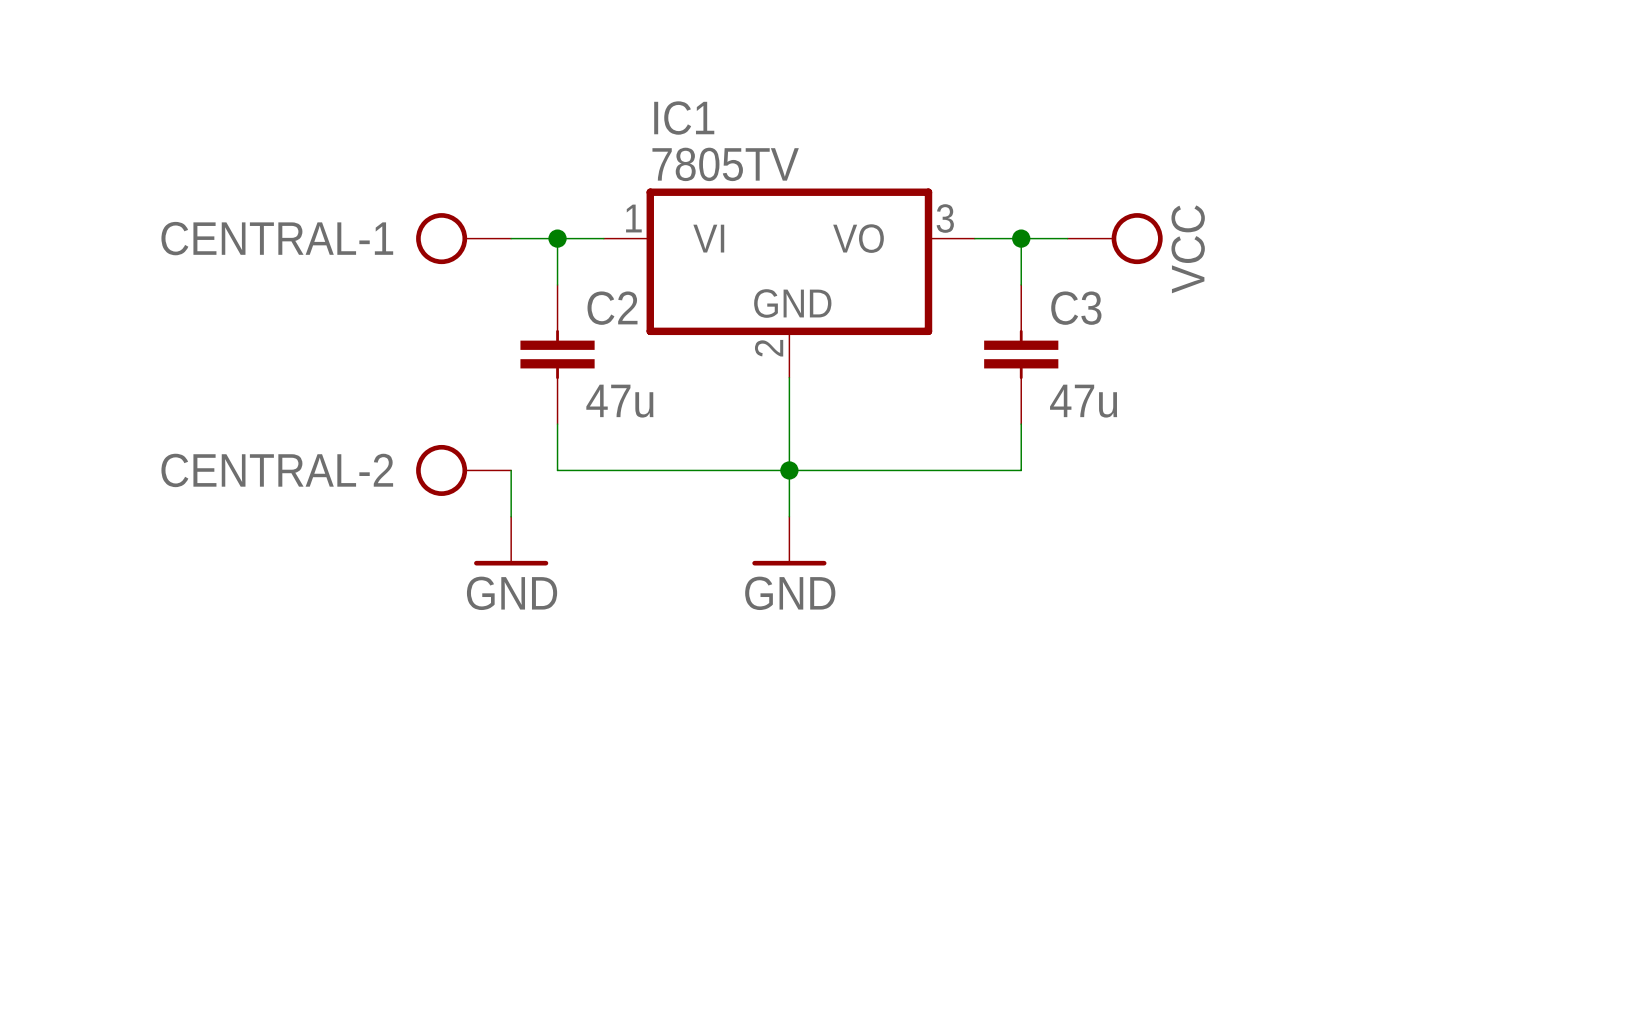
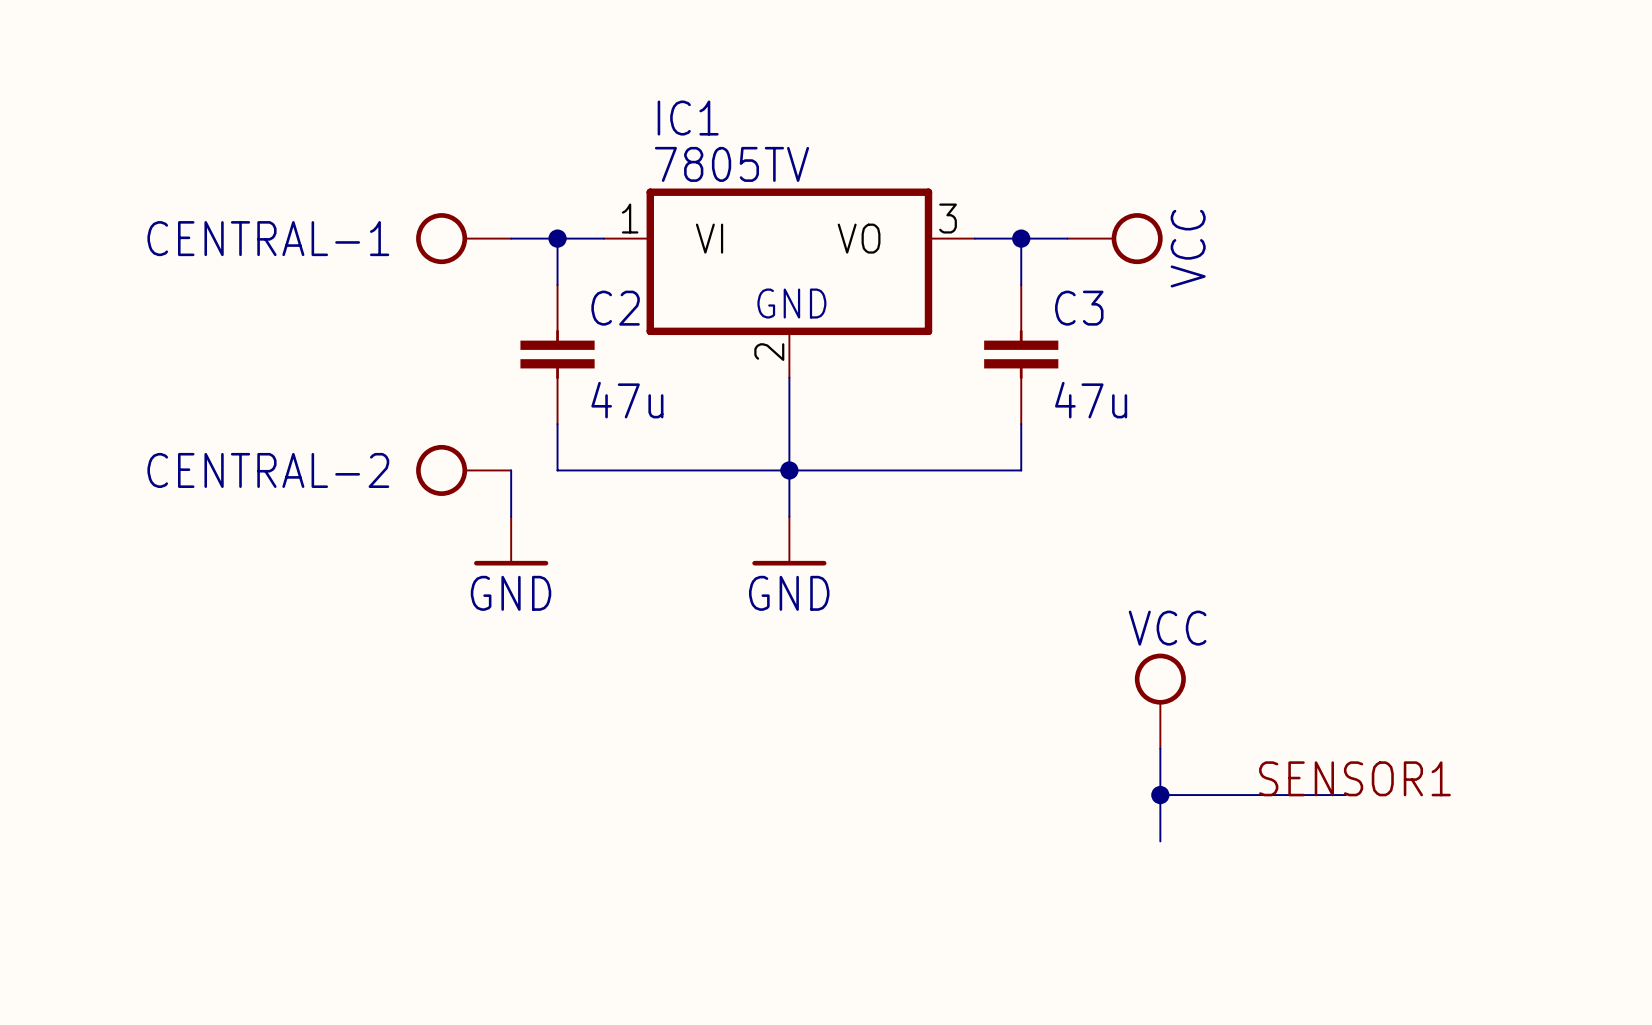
power symbol: none -> VCC (1160, 701)
wire: none -> (1160, 748) (1160, 841)
label: none -> SENSOR1 (1354, 778)
wire: none -> (1160, 795) (1345, 795)
junction: none -> (1160, 795)

